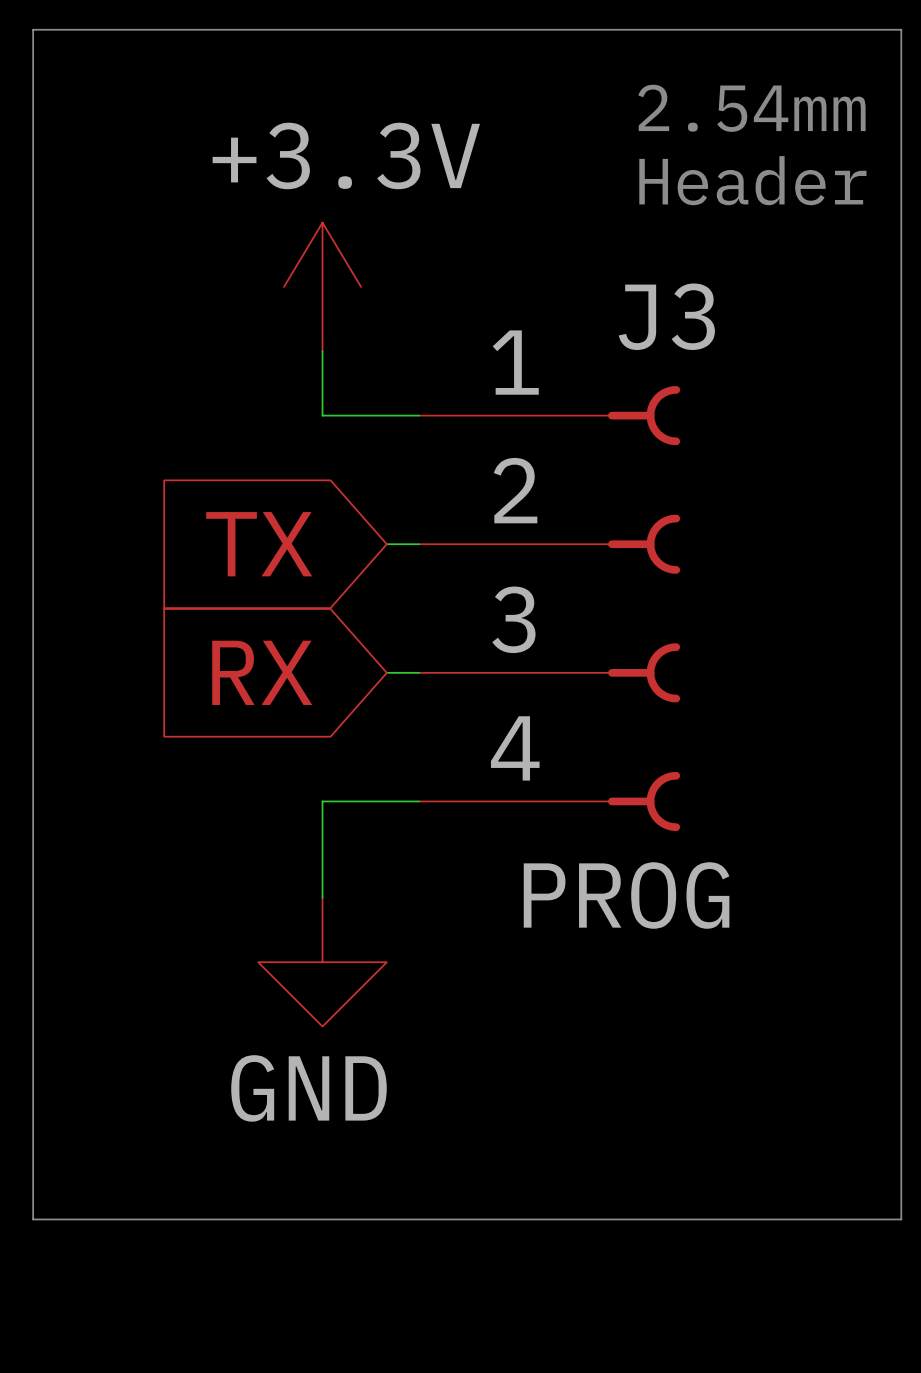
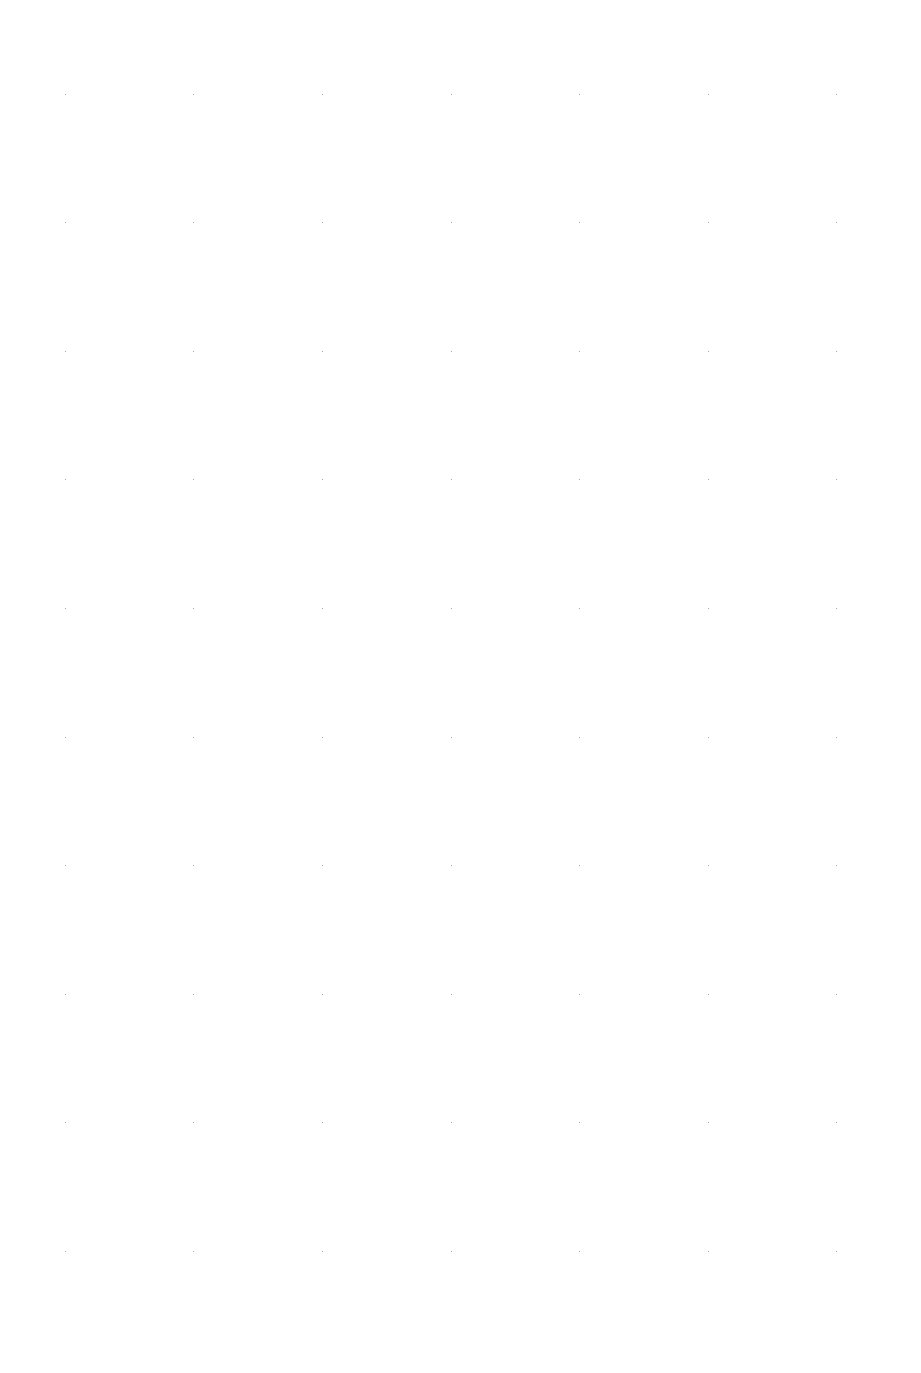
line: (33, 29) (901, 29) (901, 1219) (33, 1219) (33, 29) -> none
text: 2.54mm (751, 108) -> none
text: Header (752, 180) -> none
power symbol: +3.3V (322, 286) -> none
wire: (322, 351) (322, 415) (418, 415) -> none
global label: TX (259, 544) -> none
wire: (386, 544) (418, 544) -> none
J3: PROG (549, 608) -> none
global label: RX (262, 672) -> none
wire: (386, 672) (418, 672) -> none
wire: (418, 801) (322, 801) (322, 897) -> none
power symbol: GND (322, 962) -> none

